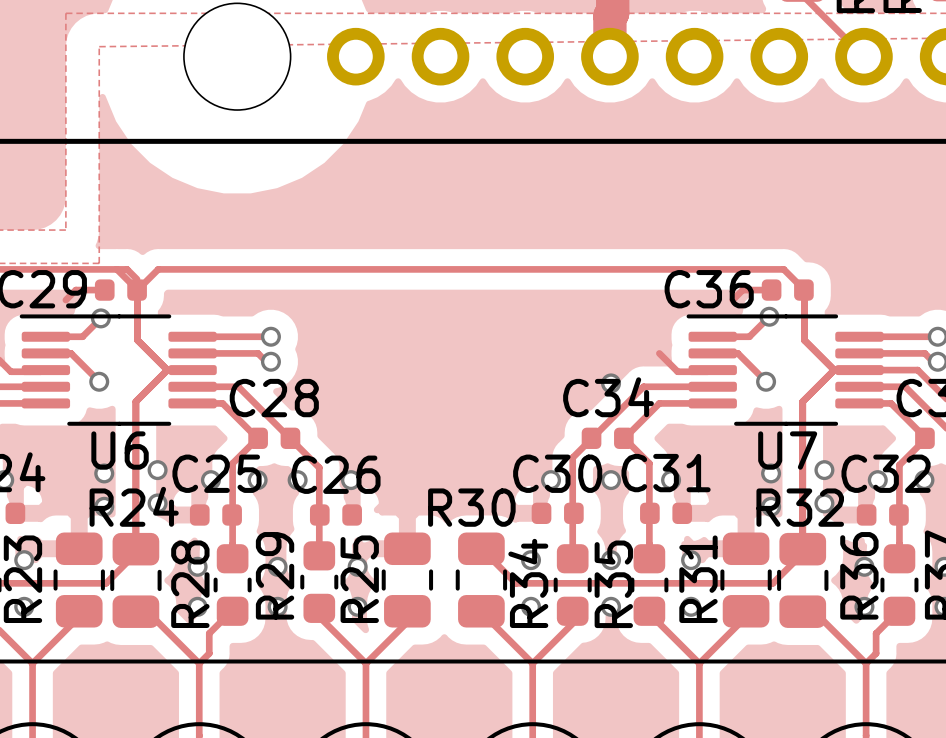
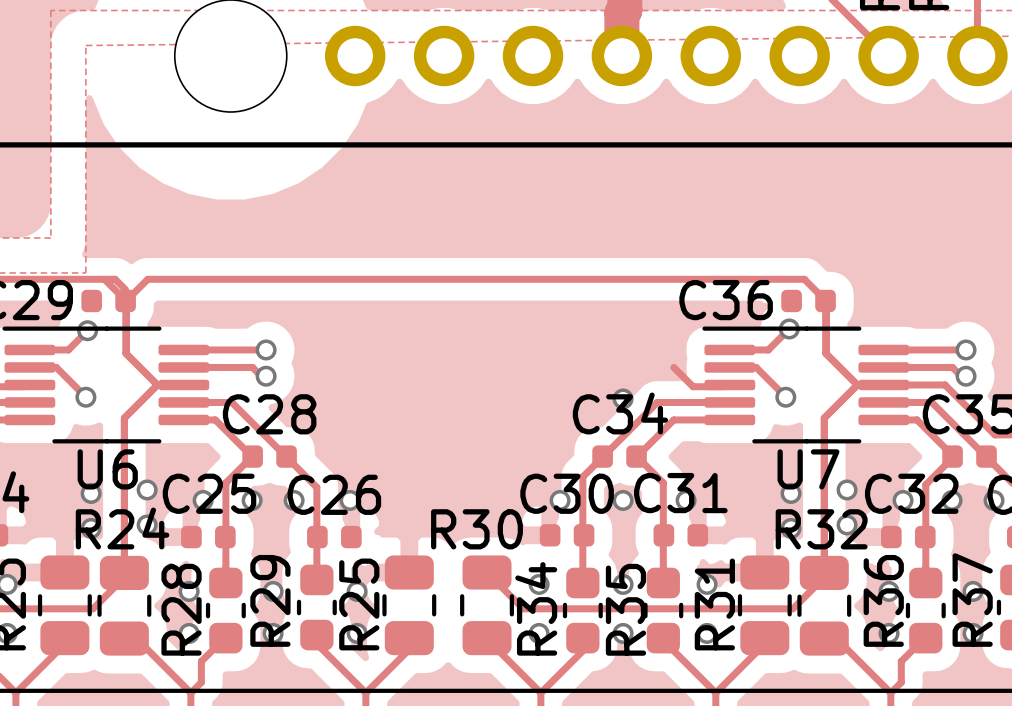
track: (104, 290) (75, 290) (65, 300) -> none
track: (771, 290) (742, 290) (732, 300) -> none

